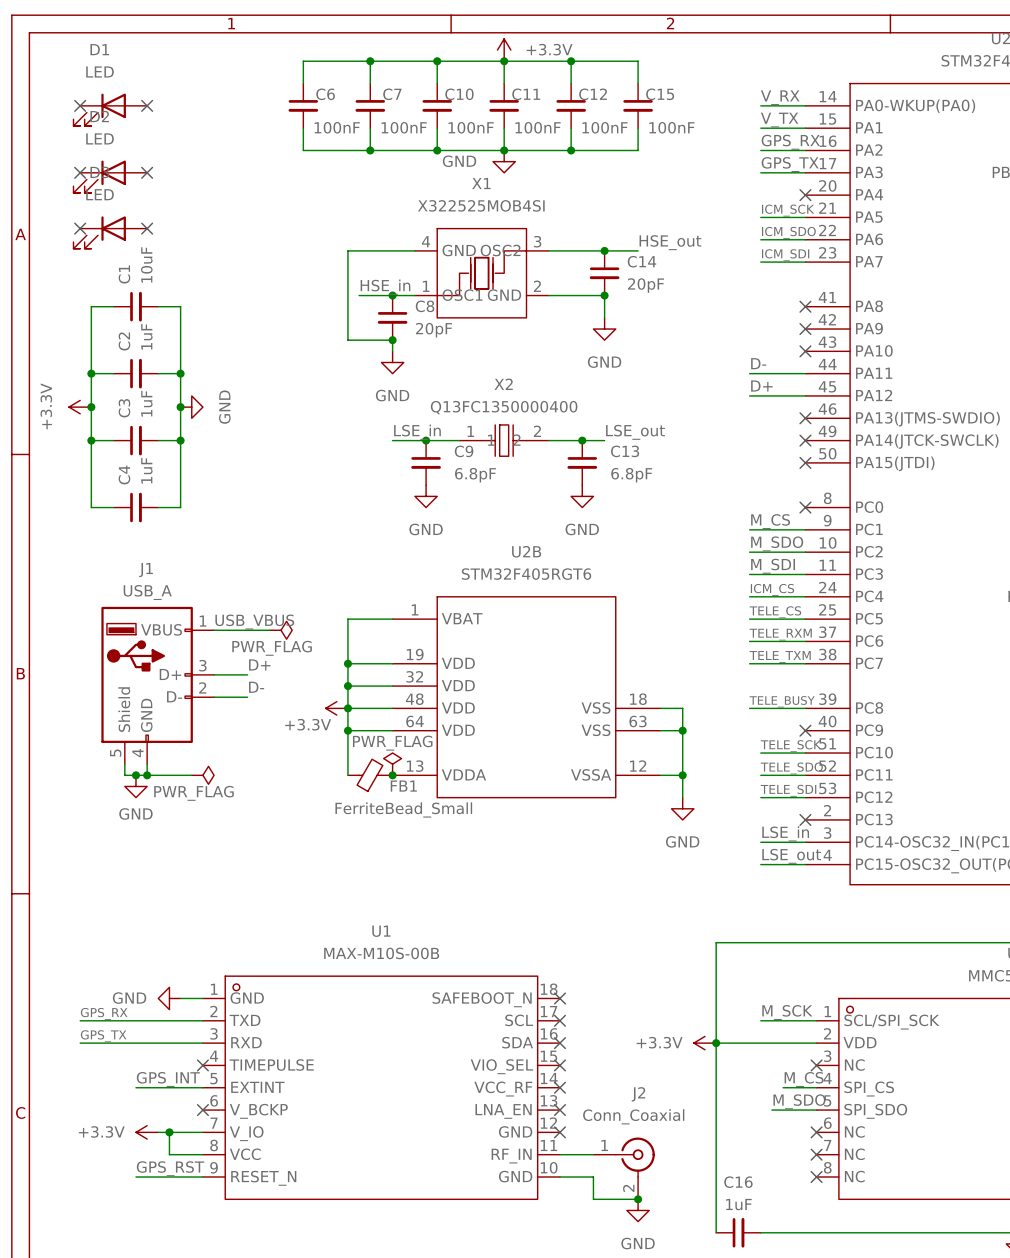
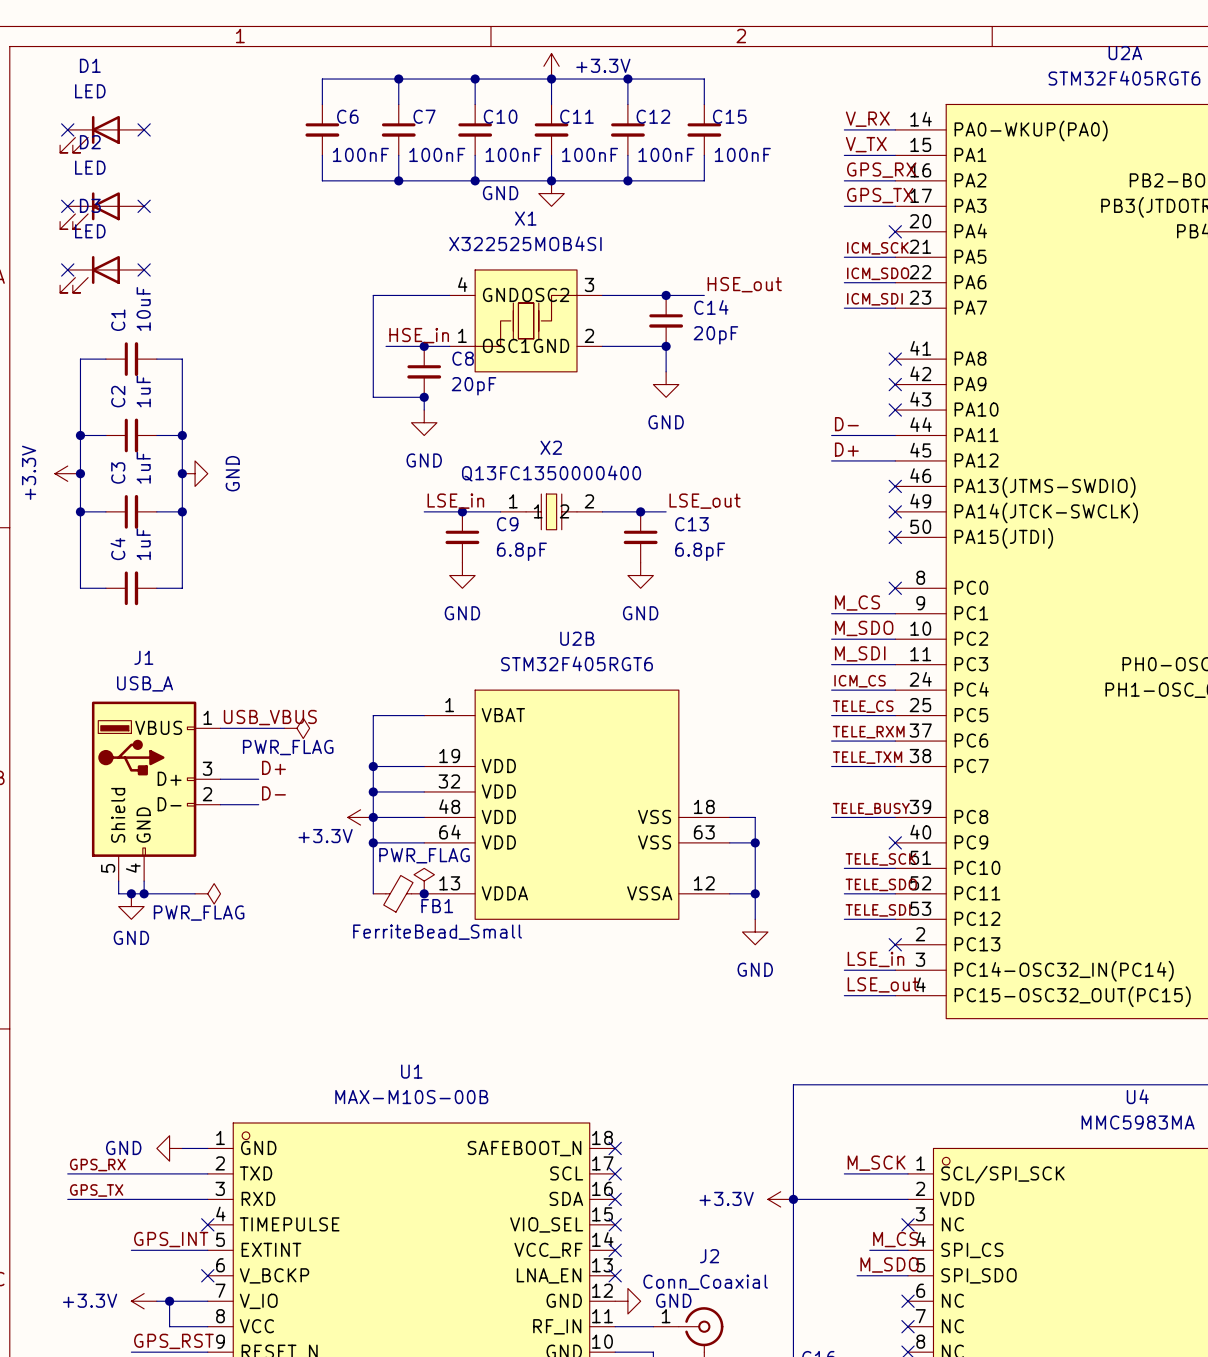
no-connect mark: (559, 1132) -> none
power symbol: none -> GND (627, 1301)

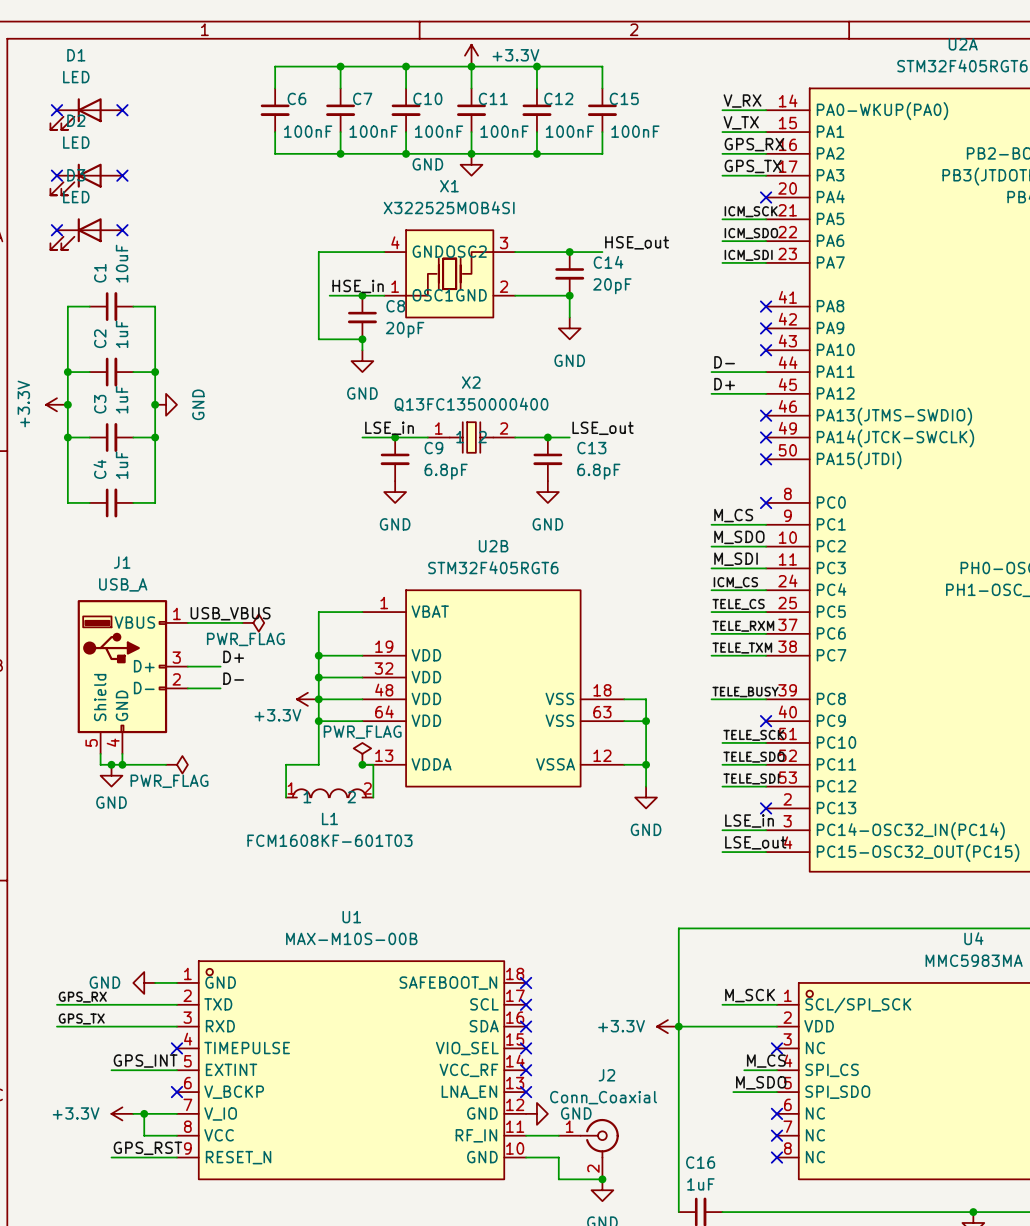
wire: none -> (318, 764) (286, 764) (286, 797)
FB1: FerriteBead_Small (398, 893) -> none
wire: none -> (362, 764) (373, 764) (373, 797)
L1: none -> FCM1608KF-601T03 (329, 793)

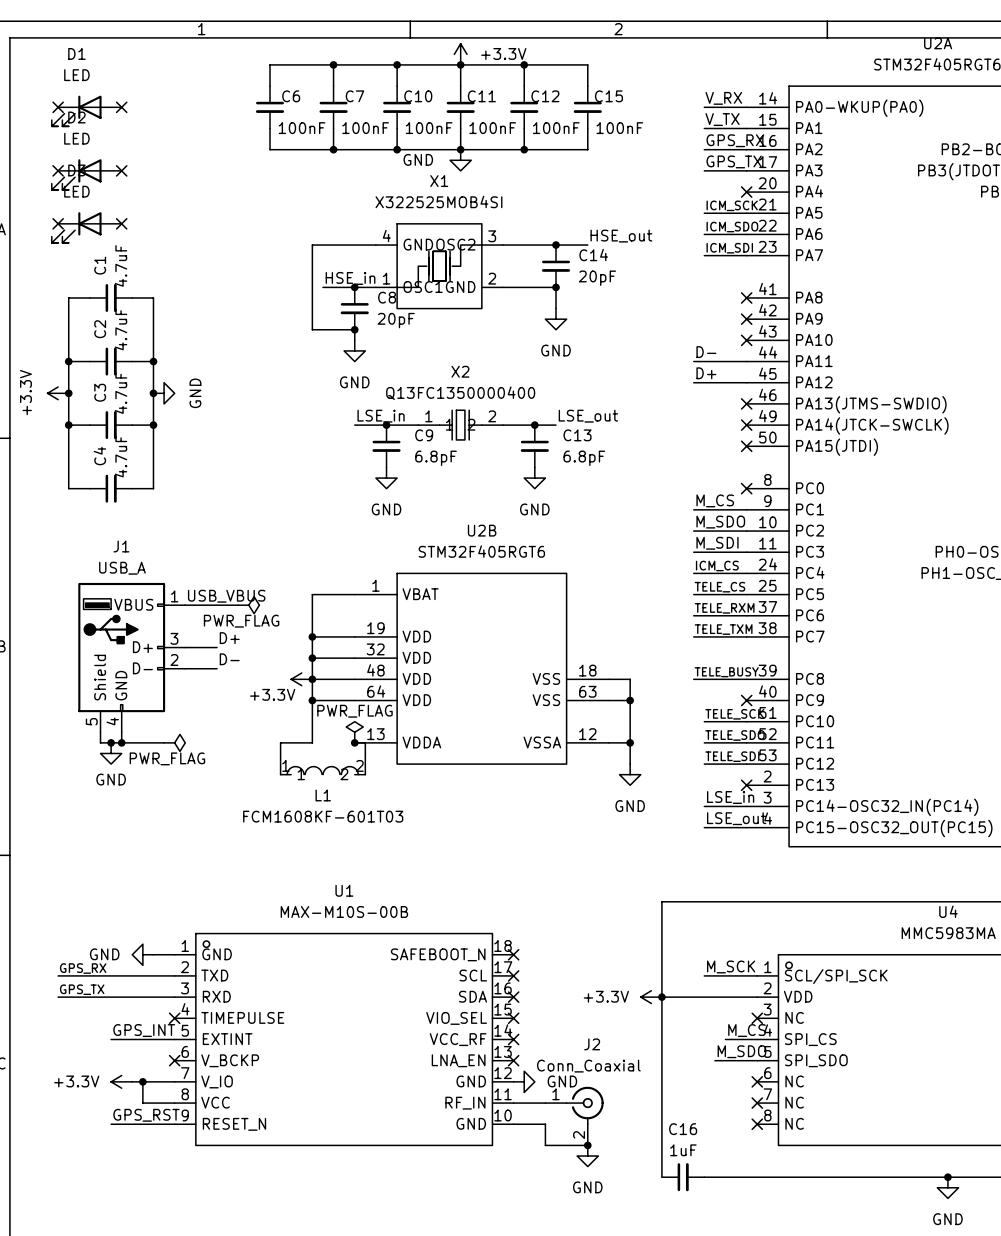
C1 value: 10uF (122, 263) -> 4.7uF (121, 265)
C2 value: 1uF (122, 334) -> 4.7uF (121, 329)
C3 value: 1uF (122, 399) -> 4.7uF (121, 393)
C4 value: 1uF (122, 465) -> 4.7uF (121, 456)

